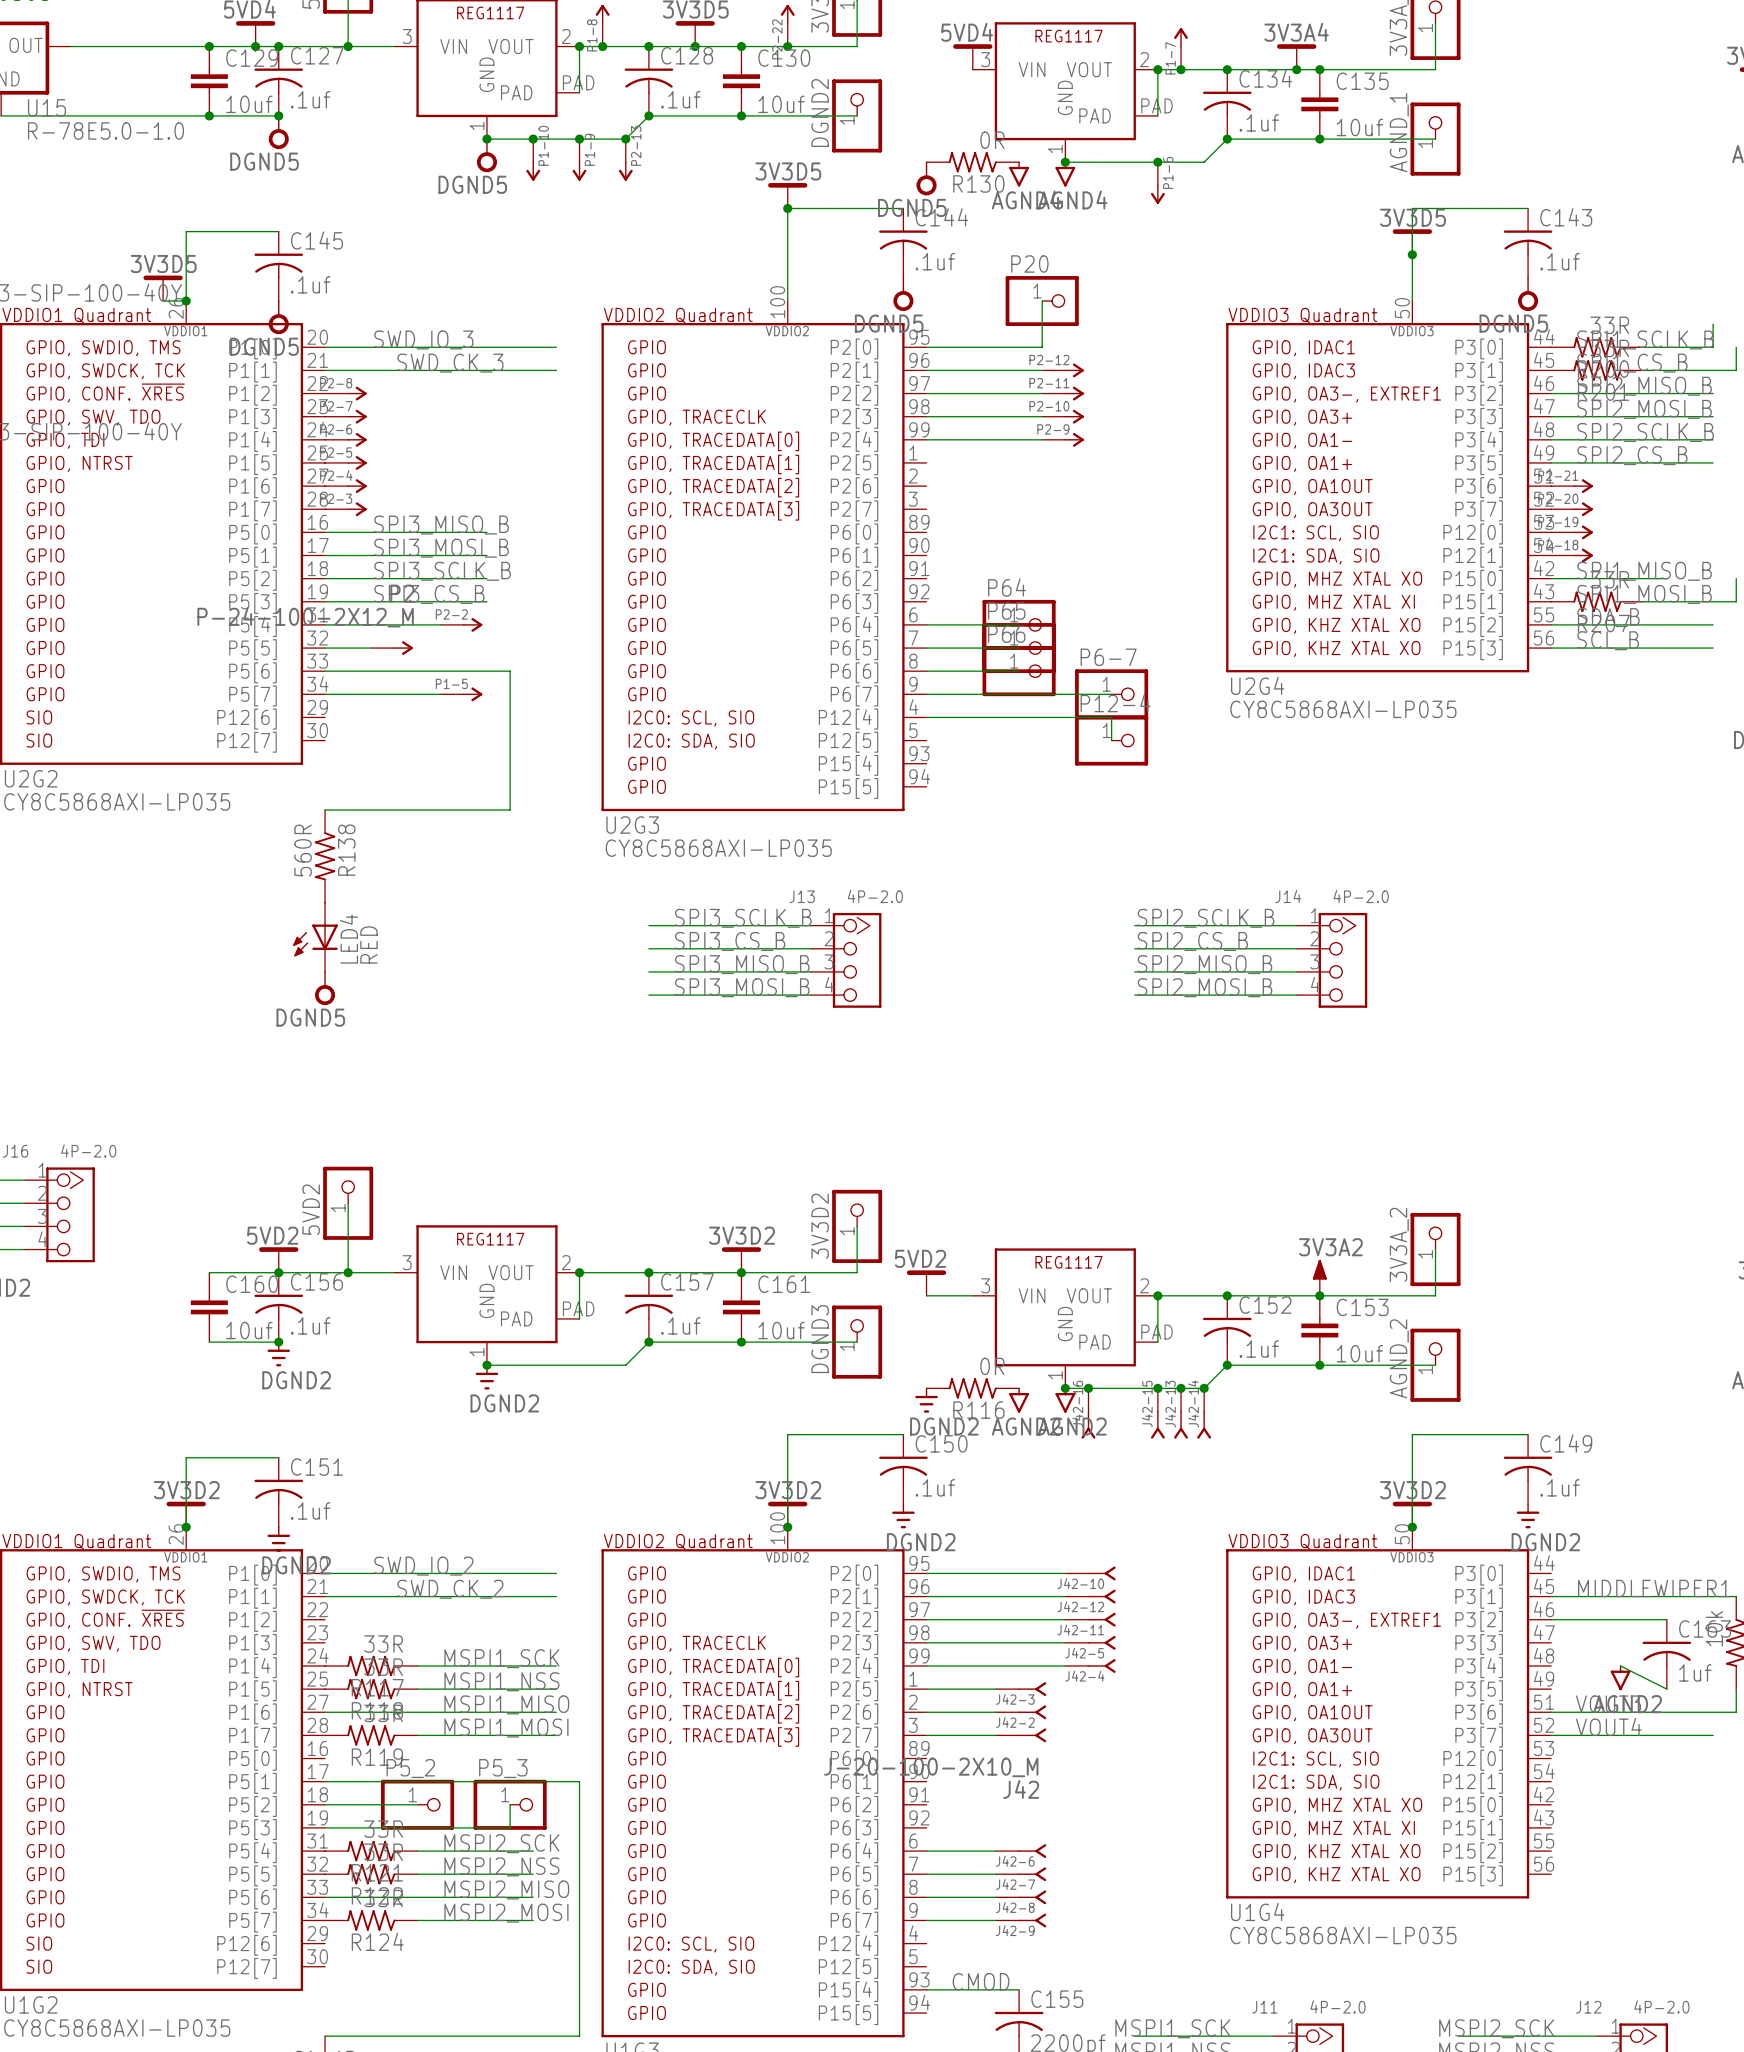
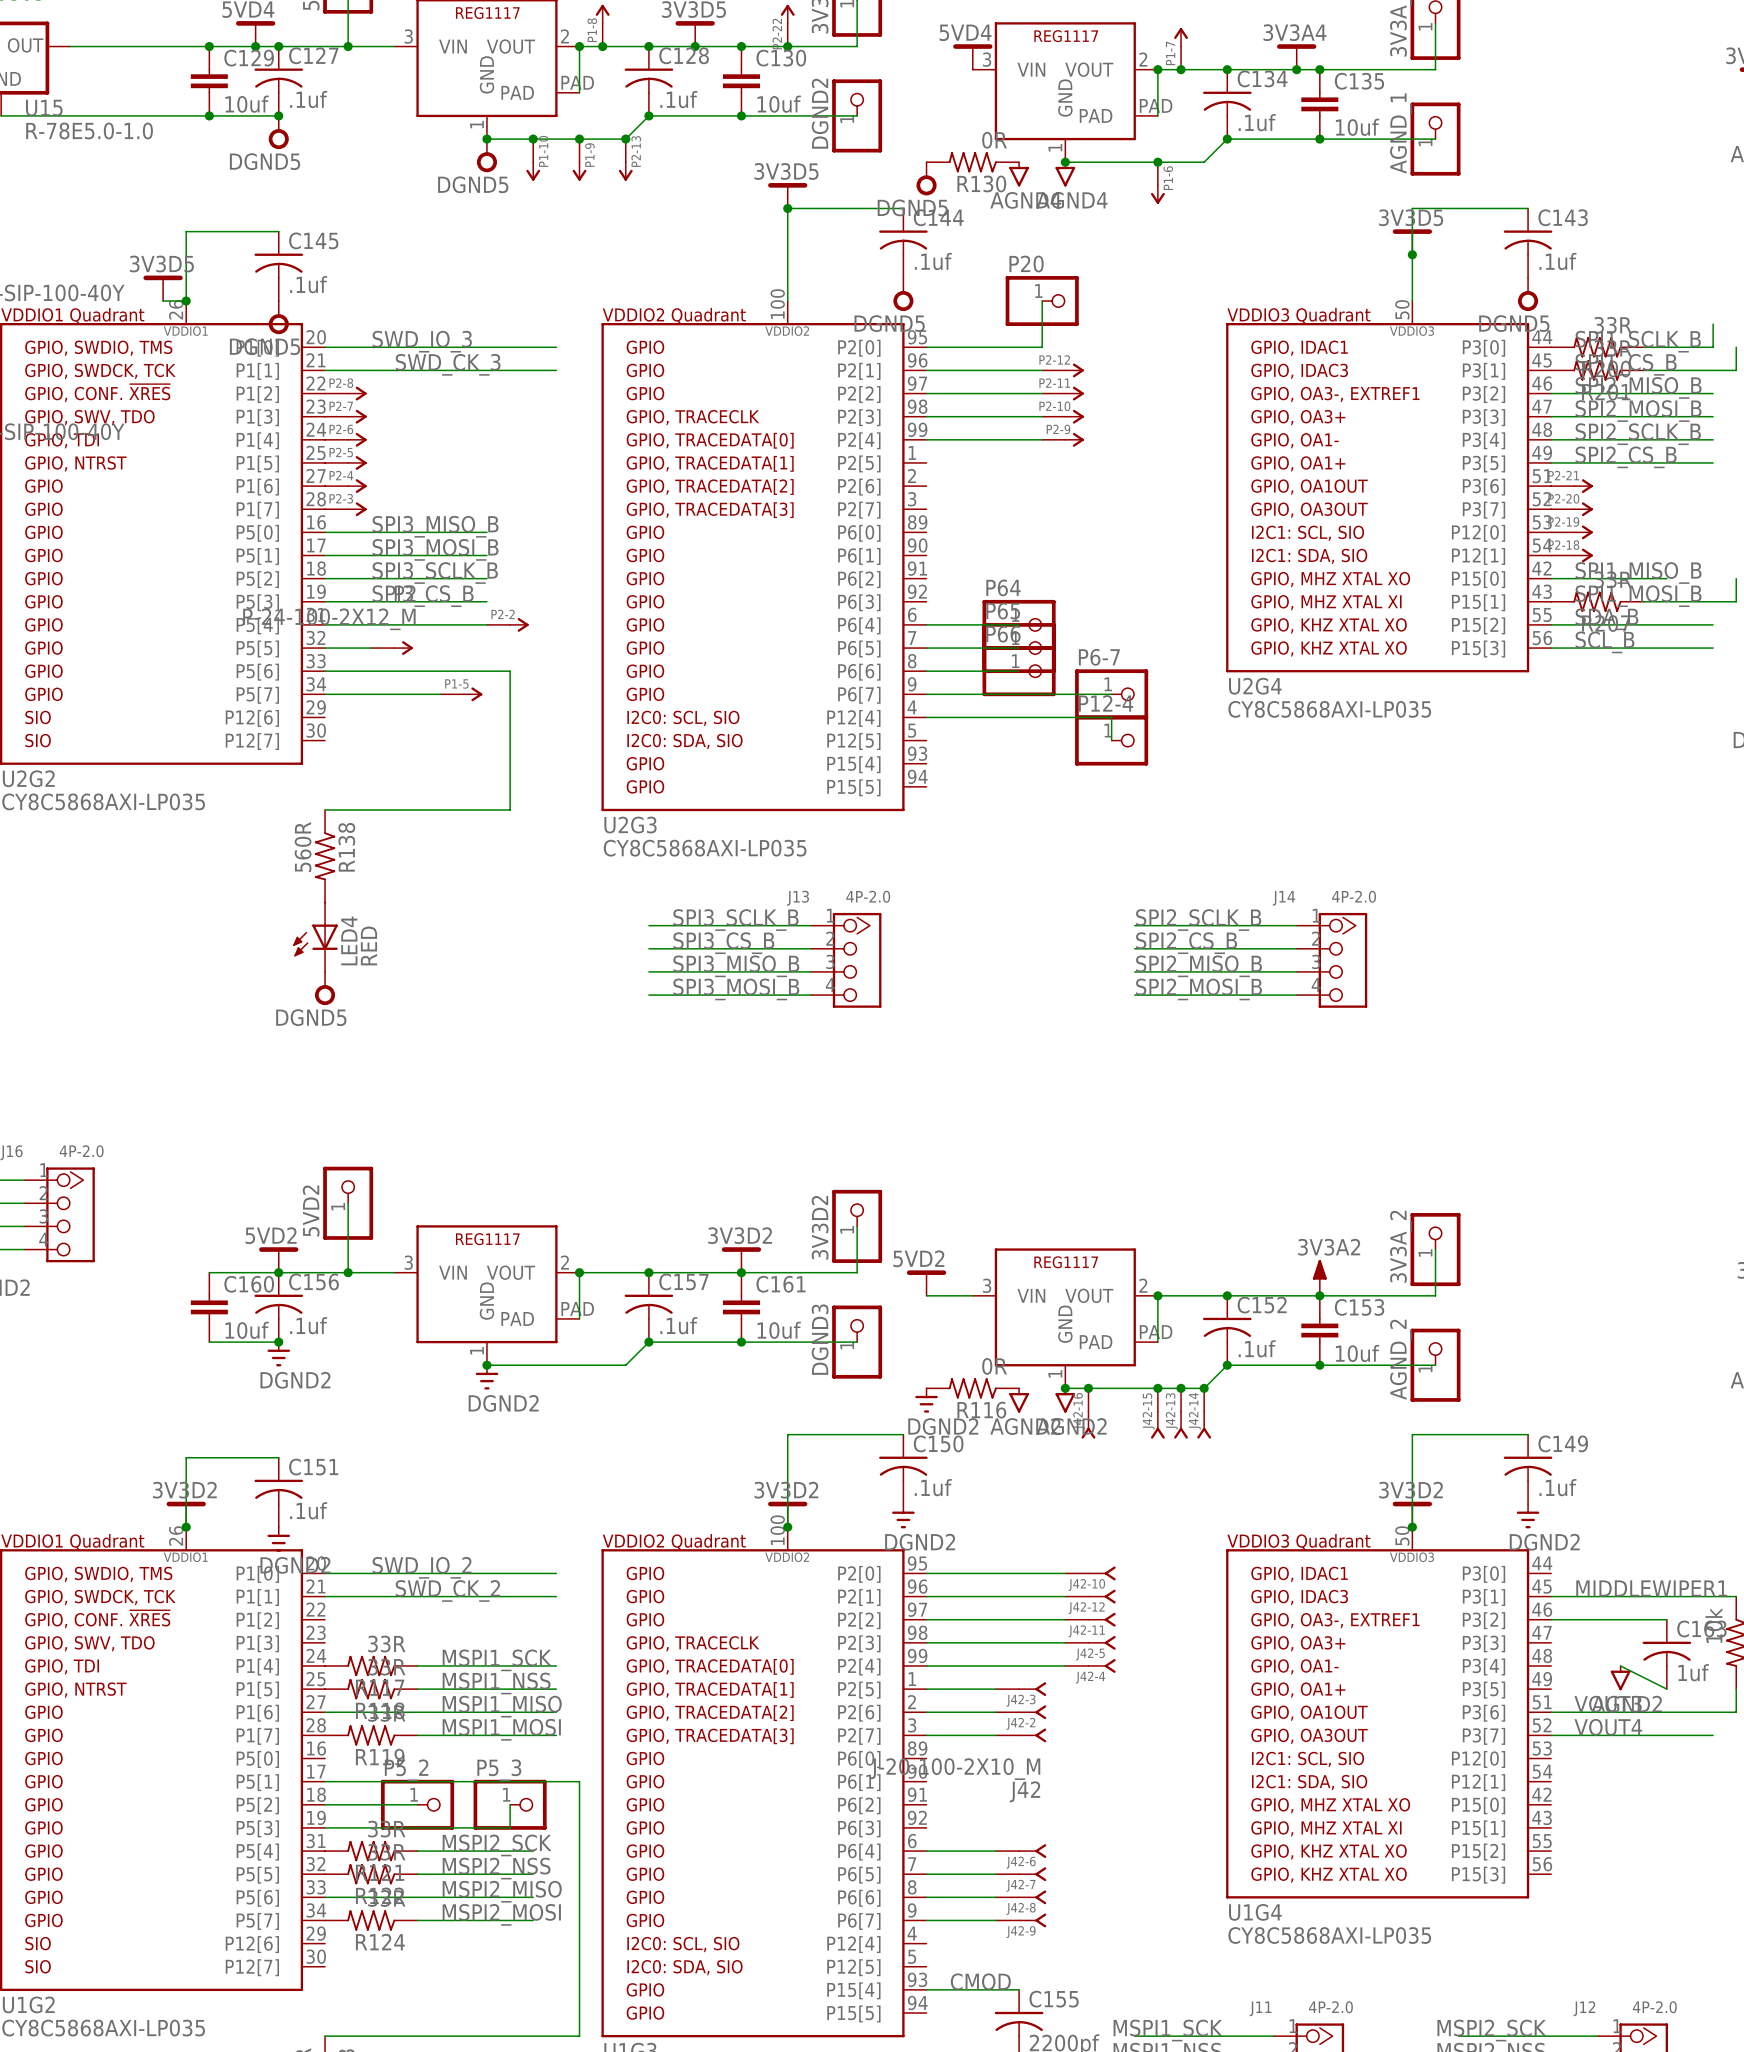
P2-2 position: (461, 624) -> (507, 624)

